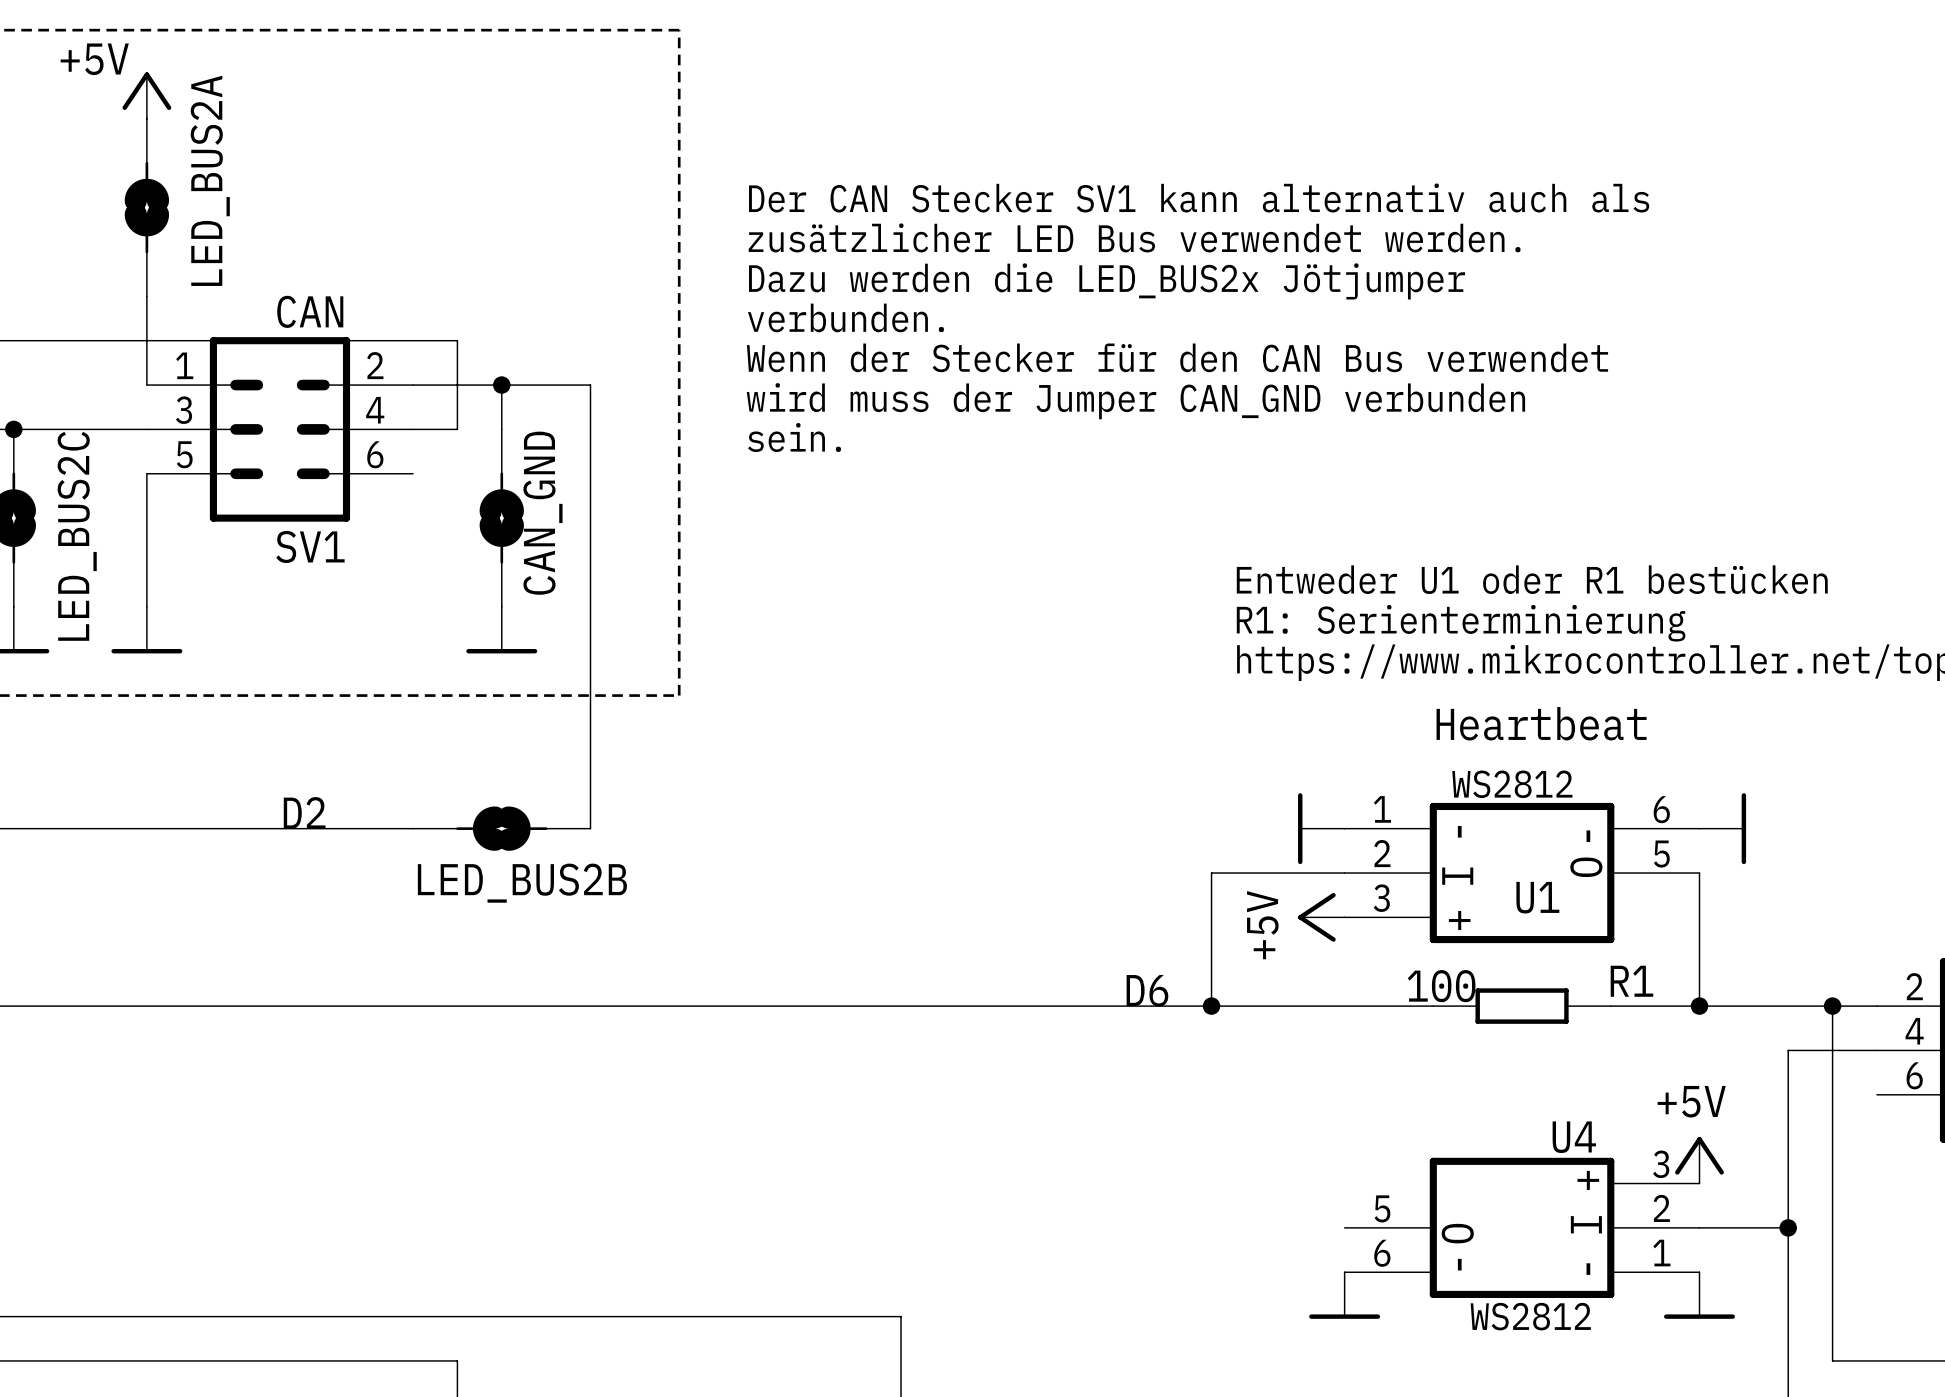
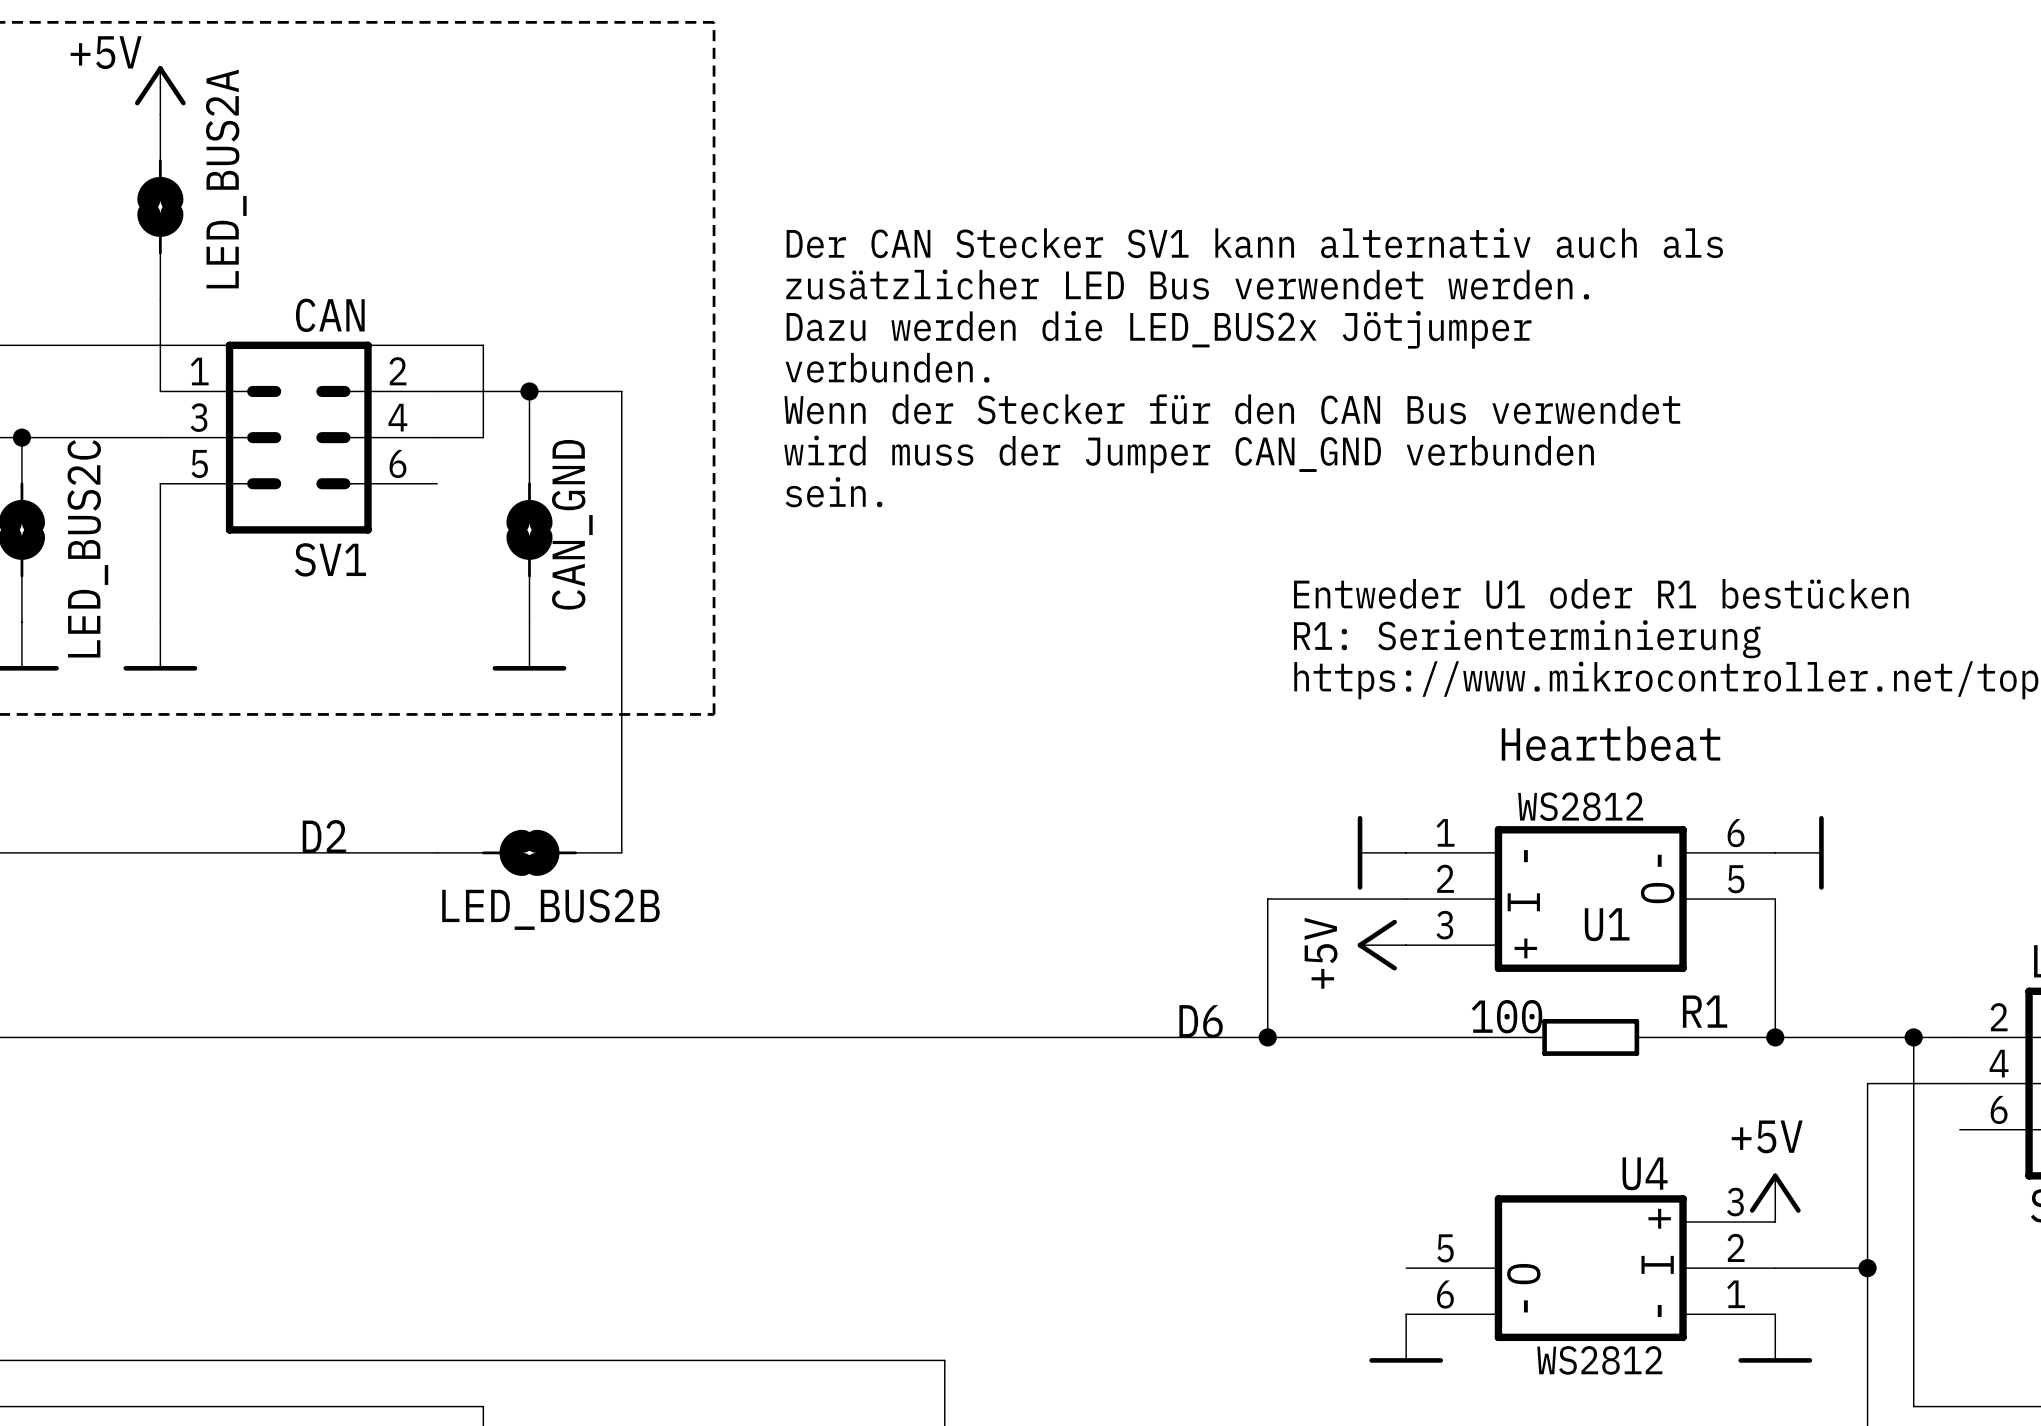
text position: Der CAN Stecker SV1 kann alternativ auch als (1199, 198) -> Der CAN Stecker SV1 kann alternativ auch als (1254, 243)
text position: zusätzlicher LED Bus verwendet werden. (1134, 237) -> zusätzlicher LED Bus verwendet werden. (1187, 284)
text position: Dazu werden die LED_BUS2x Jötjumper (1107, 281) -> Dazu werden die LED_BUS2x Jötjumper (1159, 329)
text position: verbunden. (845, 317) -> verbunden. (887, 367)
text position: Wenn der Stecker für den CAN Bus verwendet (1177, 357) -> Wenn der Stecker für den CAN Bus verwendet (1232, 409)
text position: wird muss der Jumper CAN_GND verbunden (1135, 401) -> wird muss der Jumper CAN_GND verbunden (1189, 454)
text position: sein. (794, 437) -> sein. (833, 492)

